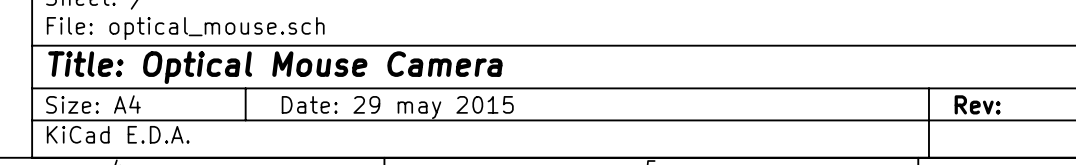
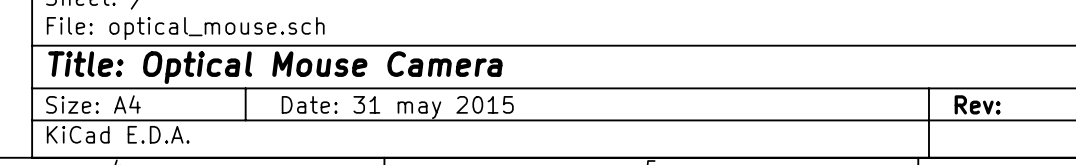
title block: Date: 29 may 2015 (397, 107) -> Date: 31 may 2015 (397, 107)

